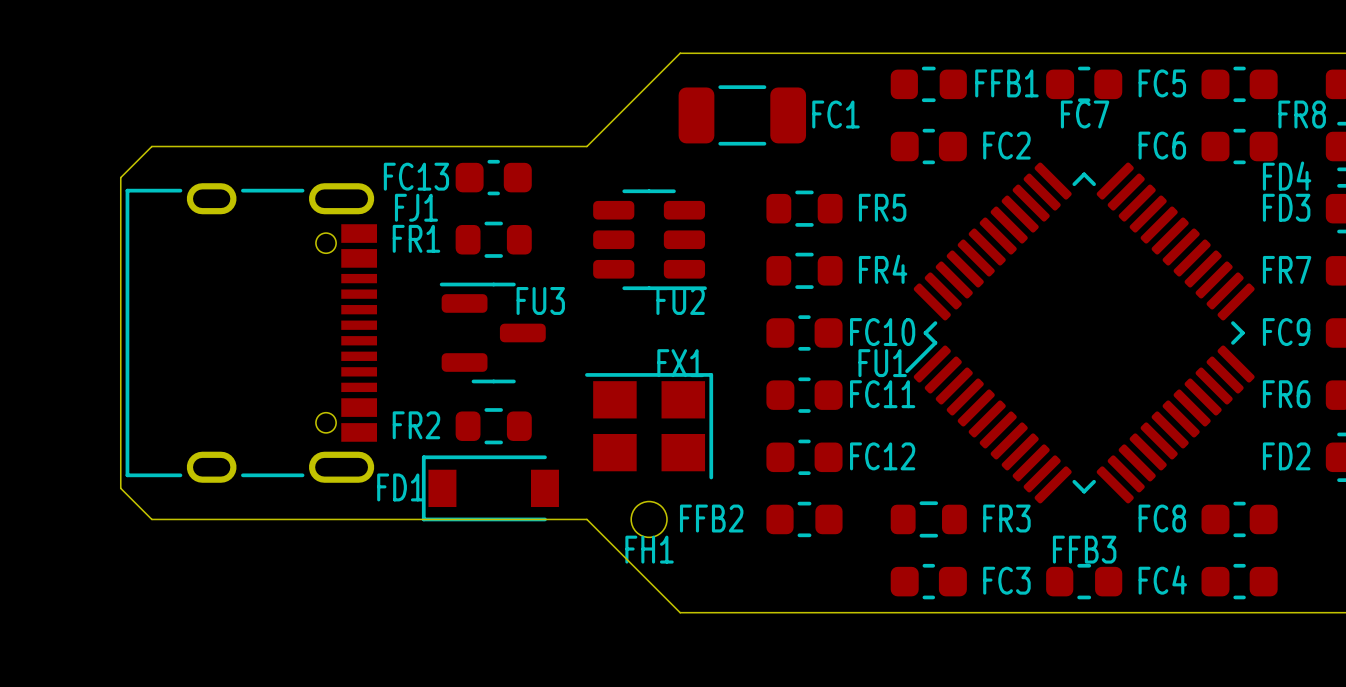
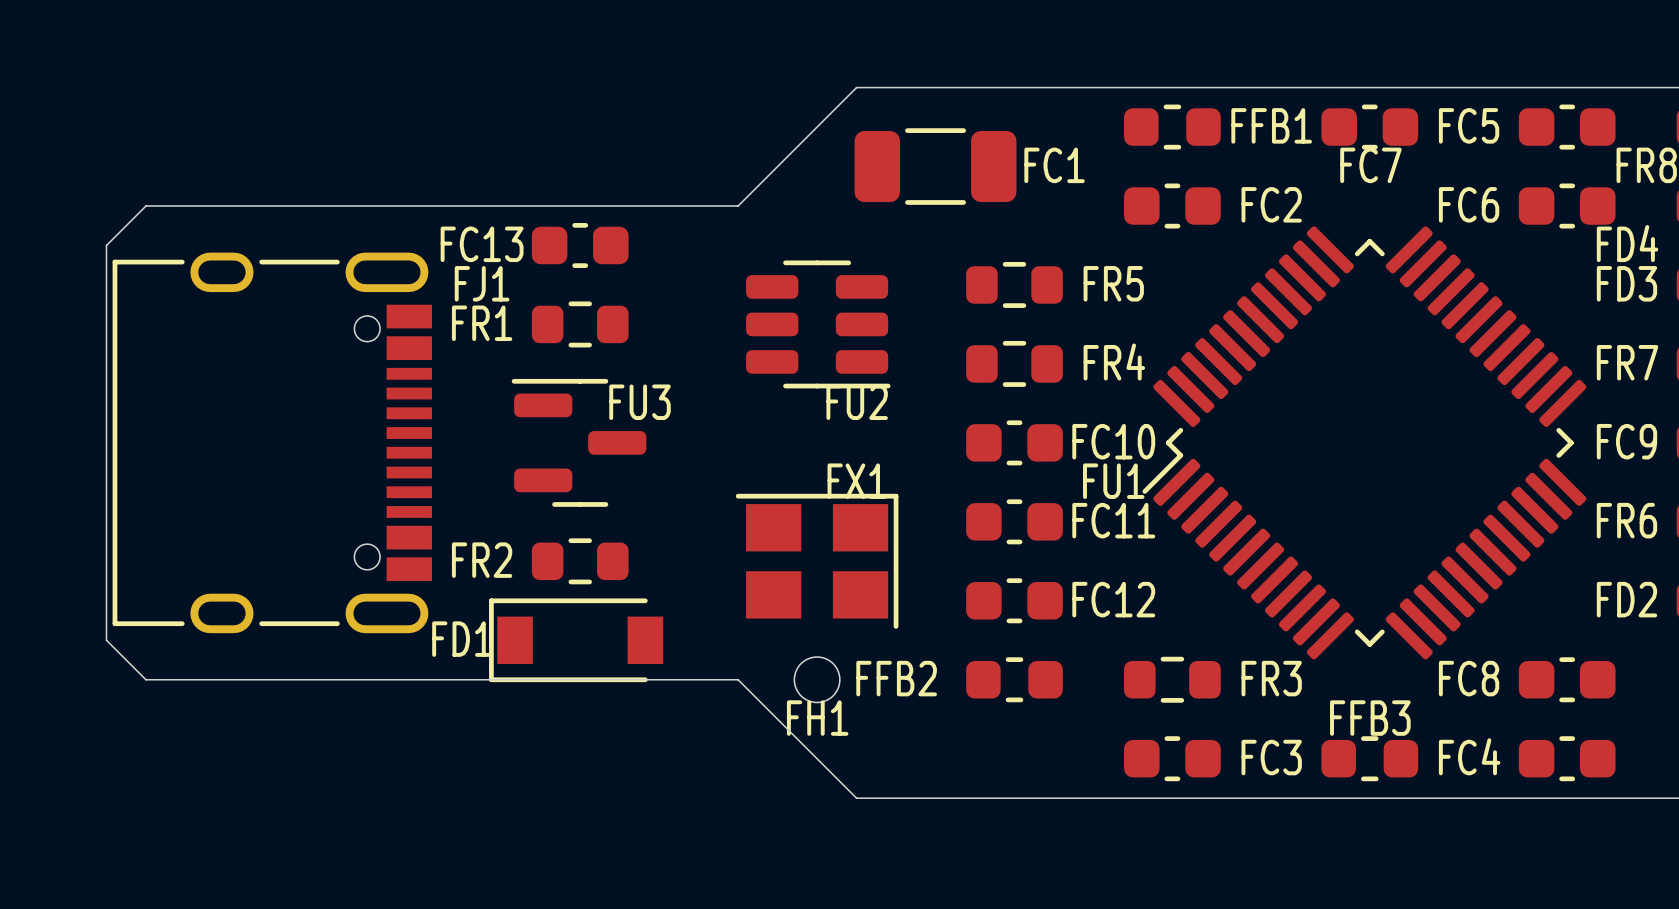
board edge: (151, 146) (120, 177) (120, 488) (151, 519) -> (185, 206) (145, 206) (106, 245) (106, 640) (145, 679) (185, 679)
FC13 position: (493, 177) -> (580, 245)
FR1 position: (493, 239) -> (580, 324)
FJ1 position: (251, 332) -> (272, 442)
FU3 position: (492, 332) -> (579, 442)
FR2 position: (493, 426) -> (580, 561)
FD1 position: (490, 488) -> (576, 640)

